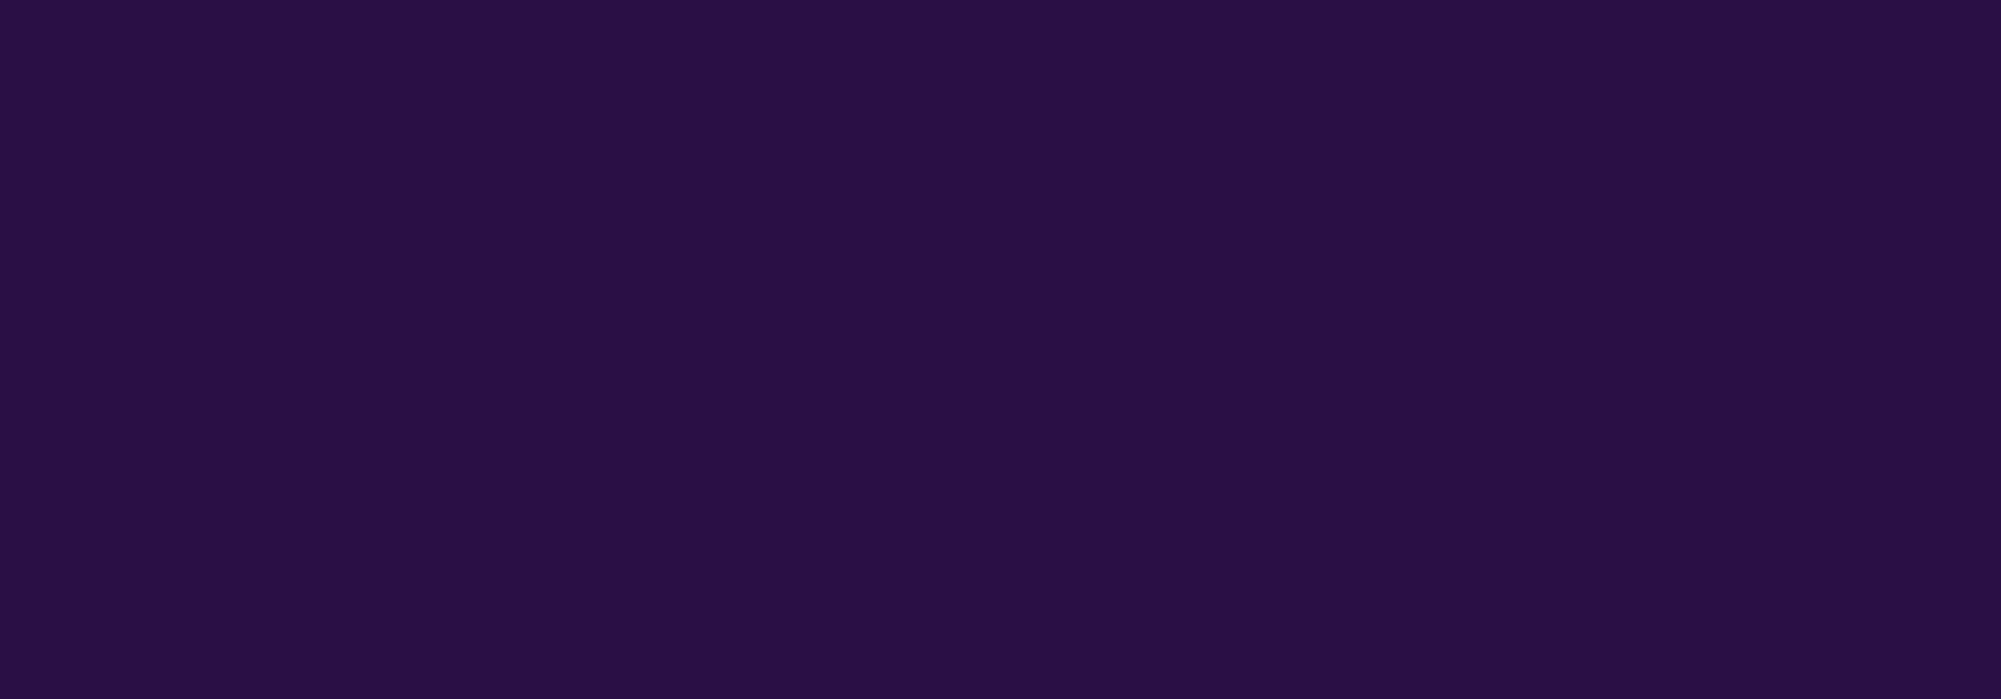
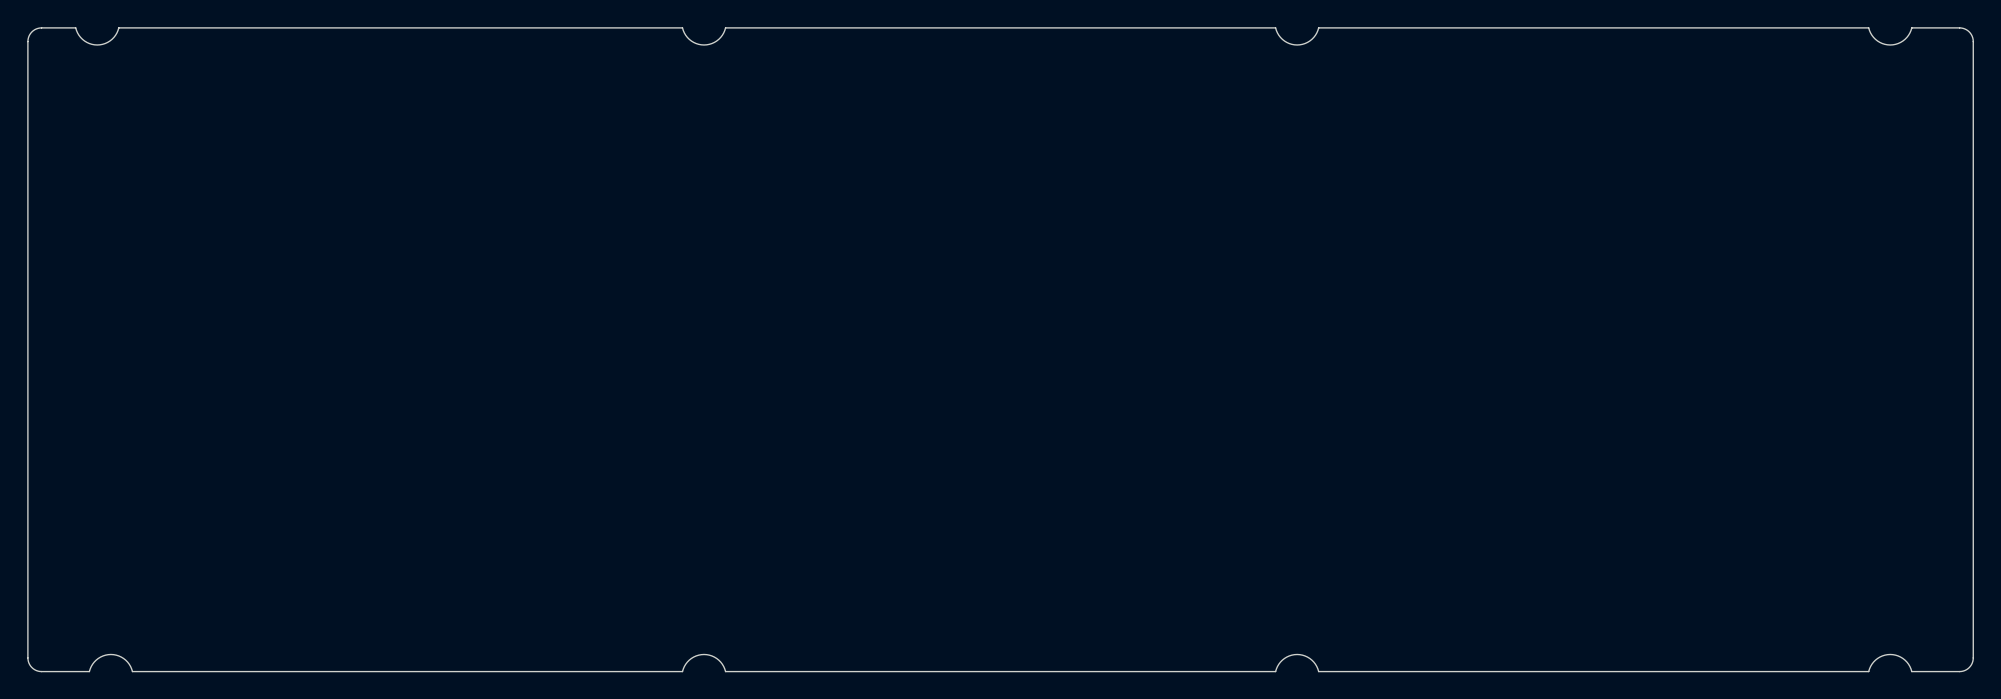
board edge: none -> (41, 27) (75, 27) (82, 39) (97, 44) (112, 39) (118, 27) (682, 27) (689, 39) (704, 44) (718, 39) (725, 27) (1275, 27) (1284, 41) (1297, 44) (1311, 39) (1318, 27) (1868, 27) (1875, 39) (1890, 44) (1905, 39) (1911, 27) (1963, 28) (1970, 33) (1973, 41) (1972, 661) (1967, 668) (1959, 671) (1911, 671) (1902, 658) (1890, 654) (1877, 658) (1868, 671) (1318, 671) (1309, 658) (1297, 654) (1284, 658) (1275, 671) (725, 671) (716, 658) (704, 654) (691, 658) (682, 671) (132, 671) (123, 658) (110, 654) (96, 660) (89, 671) (38, 671) (30, 666) (27, 657) (27, 41) (31, 31) (41, 27)

